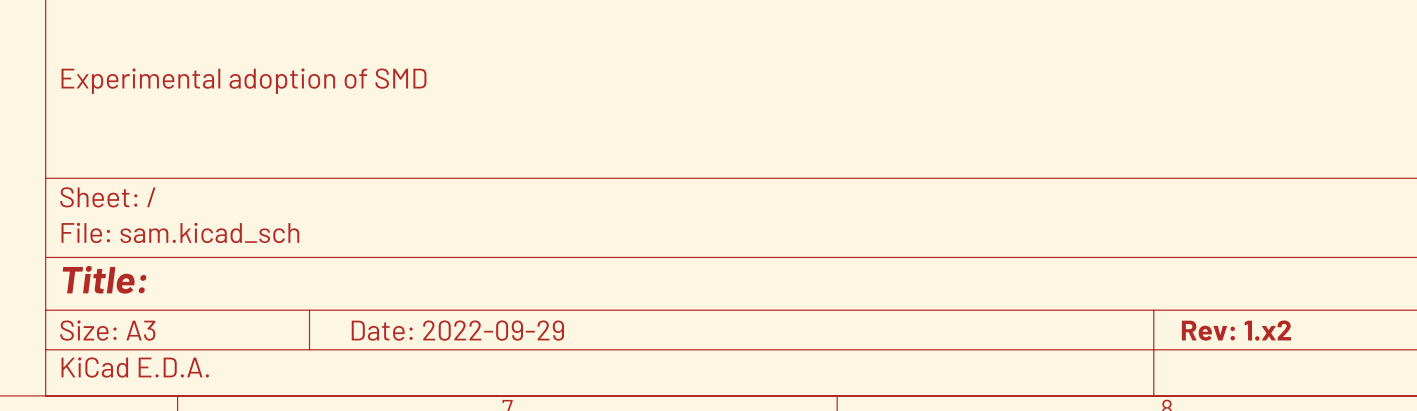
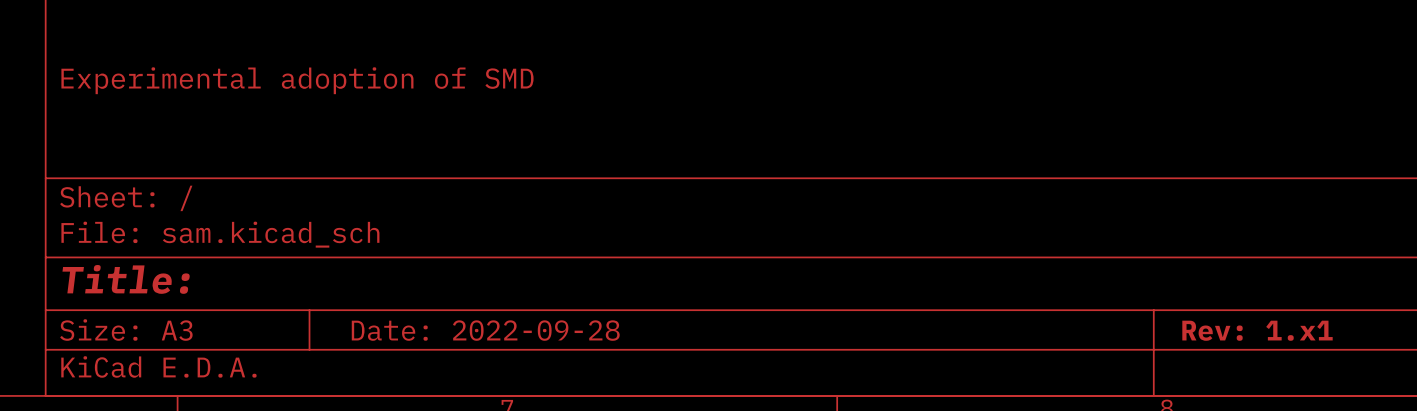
title block: Date: 2022-09-29 (457, 330) -> Date: 2022-09-28 (485, 330)
title block: Rev: 1.x2 (1236, 330) -> Rev: 1.x1 (1257, 330)

